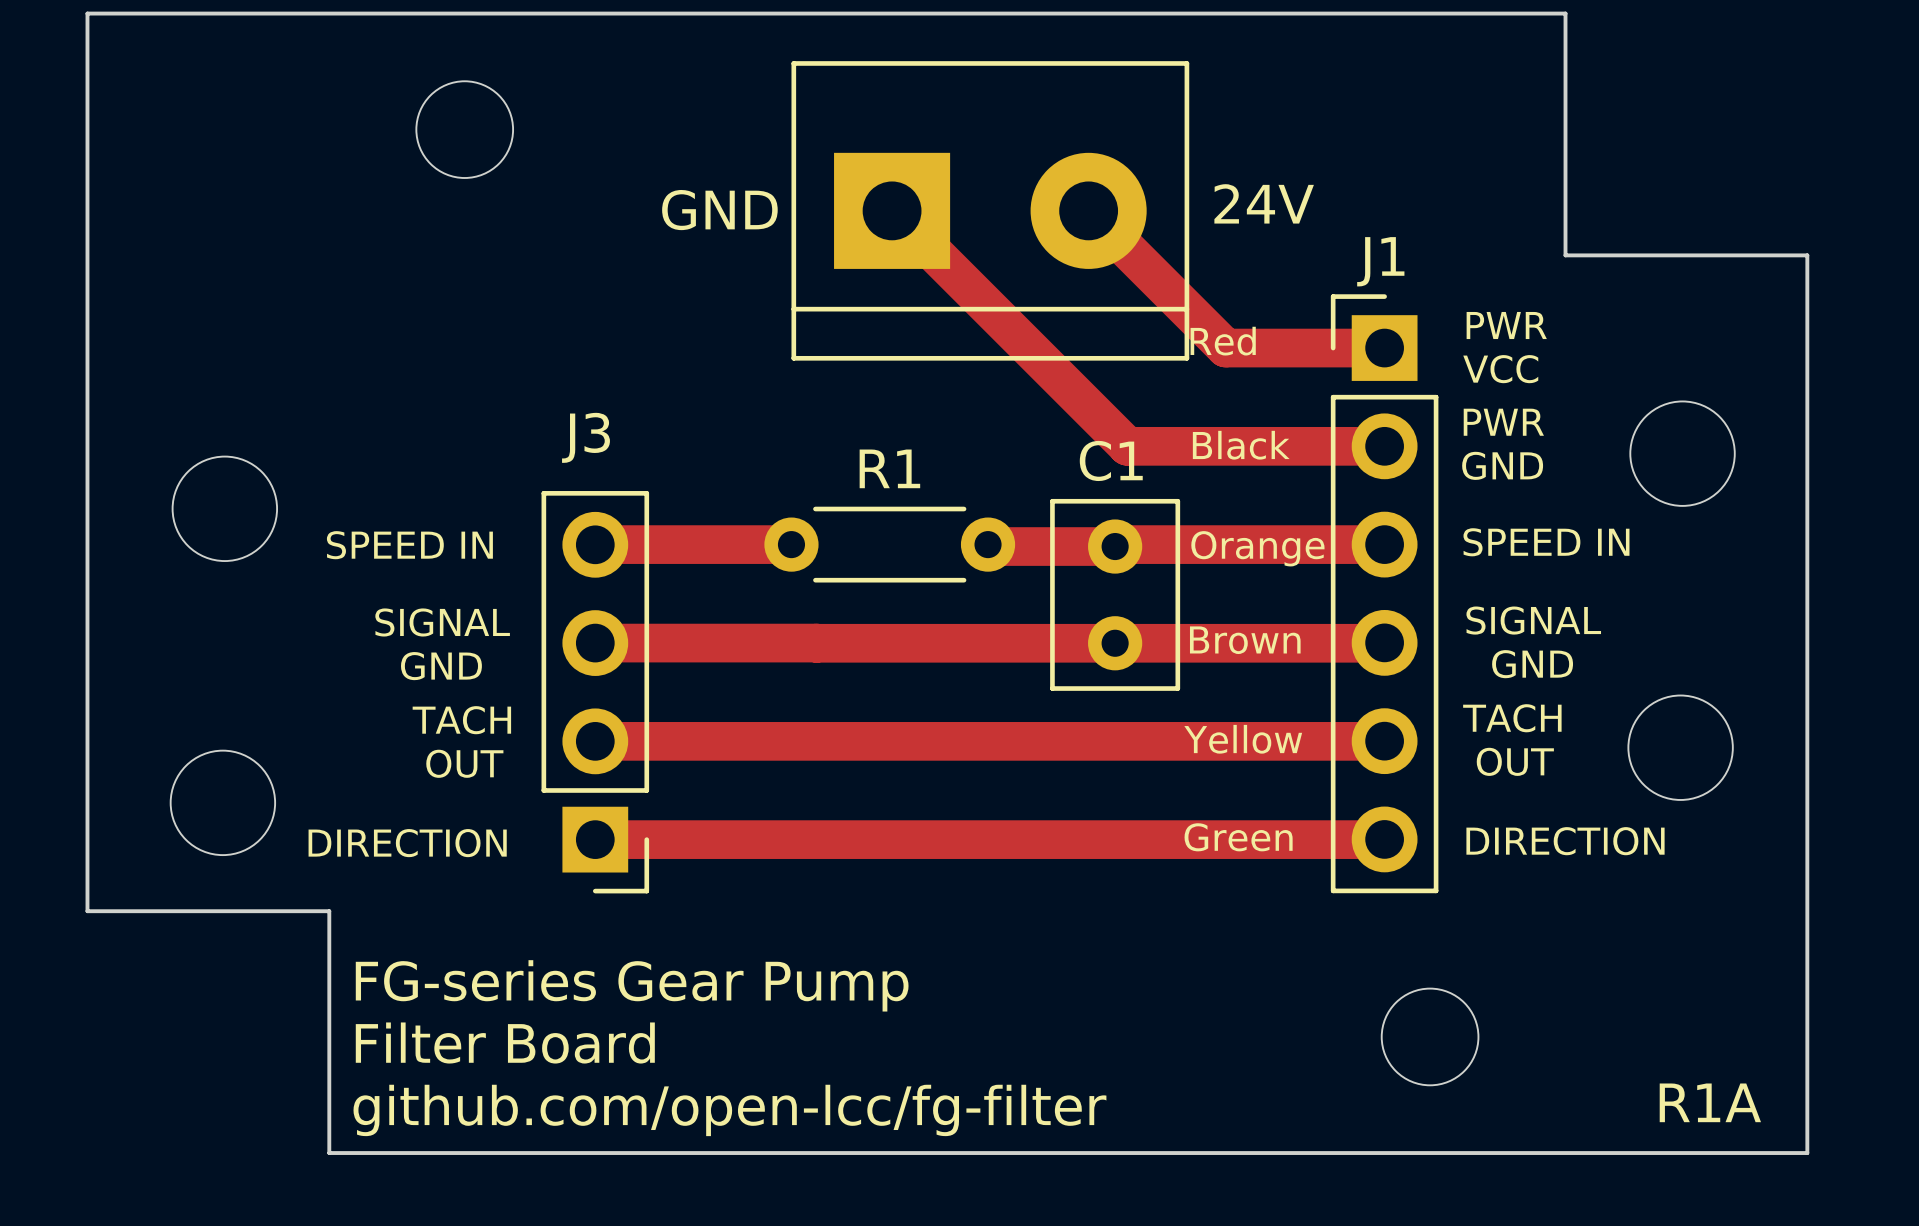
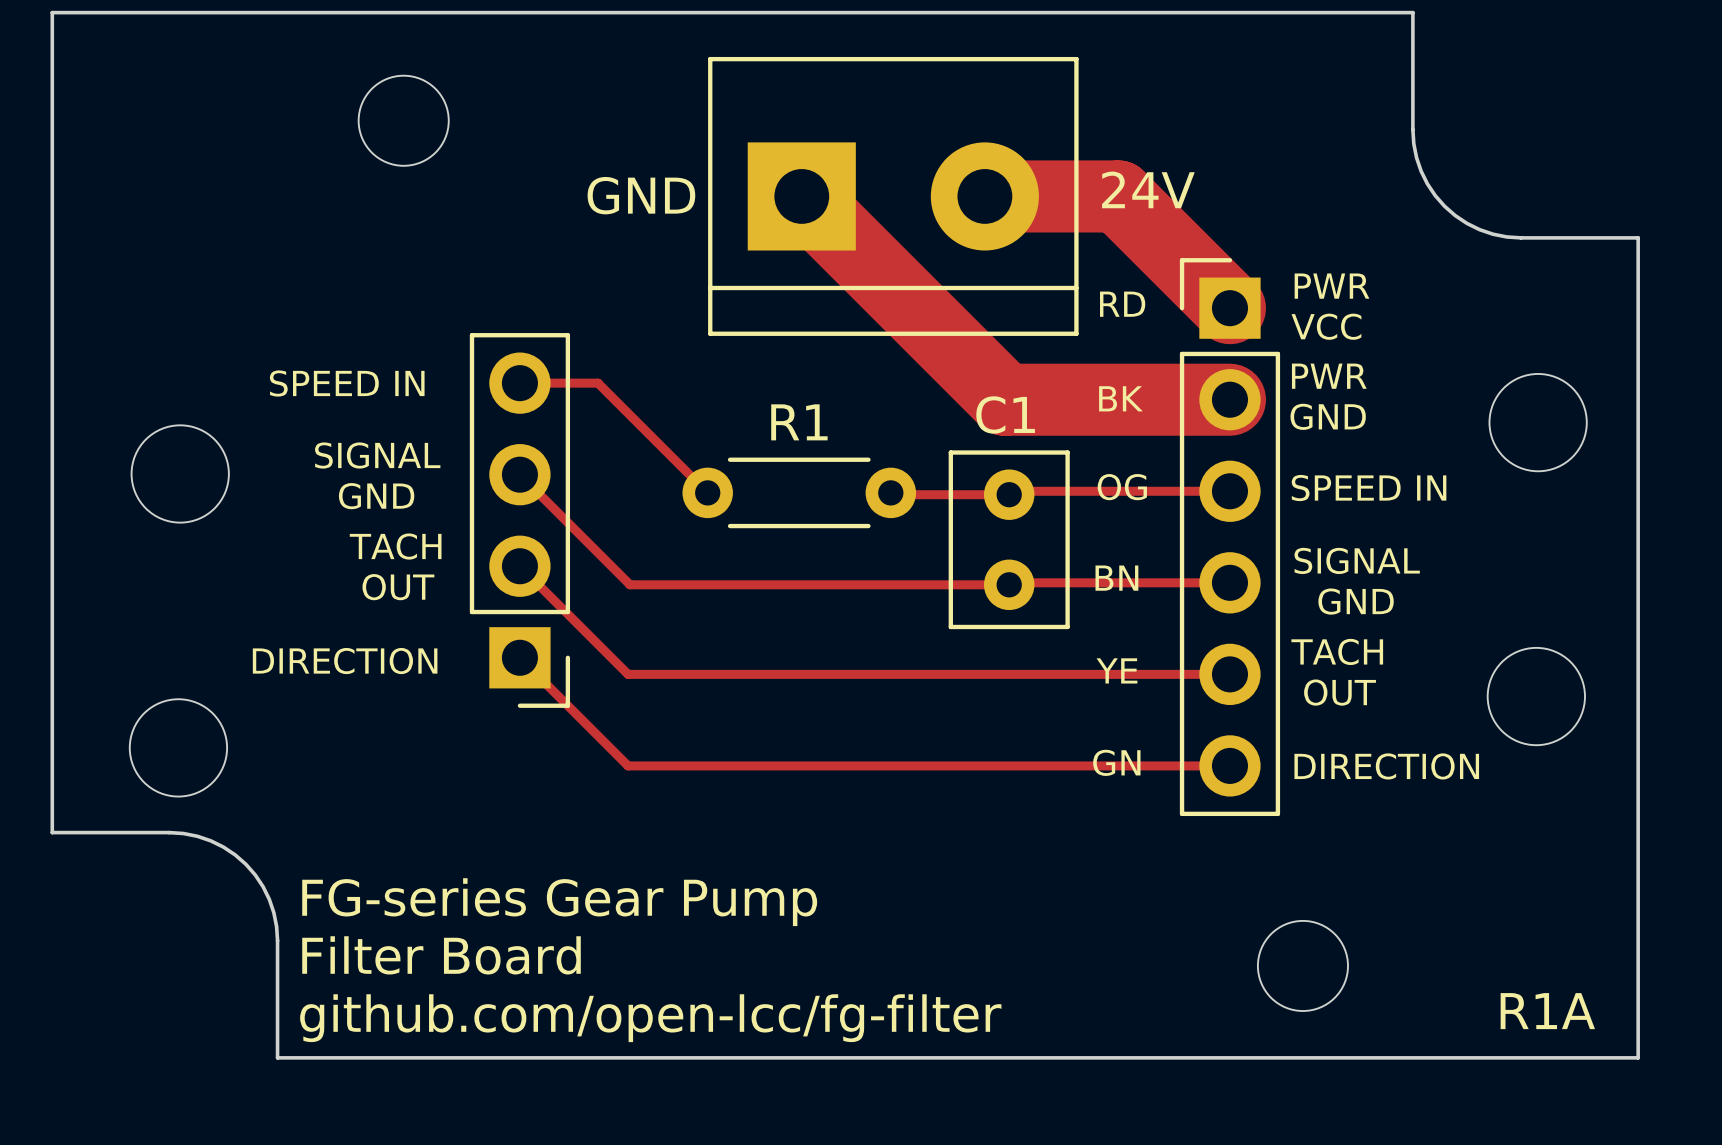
board edge: (1548, 13) (1565, 13) (1565, 255) (1664, 255) -> (1412, 12) (1412, 129) (1416, 157) (1421, 171) (1435, 195) (1455, 215) (1479, 229) (1506, 236) (1521, 237)
top track width: thin (892, 210) (1110, 429) -> thick (801, 196) (1005, 399)
top track: (1088, 210) (1225, 348) (1384, 348) -> (984, 196) (1118, 196) (1229, 308)
board edge: (1789, 255) (1807, 255) (1807, 1153) (329, 1153) (329, 1135) -> (1638, 237) (1638, 1057) (277, 1057)
J1 name: J1 (1380, 261) -> none
text position: PWR (1506, 325) -> PWR (1332, 286)
text: Red (1223, 341) -> RD (1122, 304)
text position: VCC (1500, 369) -> VCC (1326, 326)
top track: none -> (519, 383) (597, 383) (707, 492)
text position: PWR (1503, 422) -> PWR (1329, 376)
top track: (1110, 429) (1127, 446) (1384, 446) -> (1005, 399) (1229, 399)
text: Black (1241, 445) -> BK (1120, 398)
text position: GND (1502, 465) -> GND (1328, 416)
top track: none -> (519, 474) (630, 584) (1229, 582)
top track: none -> (1229, 491) (1012, 491) (1009, 494) (892, 494) (890, 492)
text position: SPEED IN (1546, 542) -> SPEED IN (1369, 488)
top track: (595, 544) (791, 544) -> none
R1 position: (889, 544) -> (799, 492)
top track: (988, 544) (989, 546) (1384, 544) (1382, 546) -> none
text position: SPEED IN (409, 545) -> SPEED IN (347, 383)
text: Orange (1257, 548) -> OG (1122, 487)
part: none -> (519, 520)
J1 position: (1384, 593) -> (1229, 537)
C1 position: (1115, 594) -> (1009, 539)
top track: none -> (519, 566) (628, 674) (1229, 674)
text position: SIGNAL (1533, 620) -> SIGNAL (1357, 560)
text position: SIGNAL (442, 622) -> SIGNAL (377, 455)
text: Brown (1245, 640) -> BN (1116, 578)
top track: (595, 643) (816, 643) -> none
top track: (816, 643) (1384, 643) -> none
text position: GND (1532, 664) -> GND (1356, 601)
text position: GND (441, 666) -> GND (376, 496)
J3: (595, 692) -> none
top track: none -> (519, 657) (628, 765) (1229, 765)
text position: TACH (1512, 718) -> TACH (1337, 651)
text position: TACH (461, 720) -> TACH (395, 546)
text: Yellow (1243, 739) -> YE (1116, 670)
top track: (595, 741) (1384, 741) -> none
text position: OUT (1515, 761) -> OUT (1340, 692)
text position: OUT (464, 763) -> OUT (398, 587)
text: Green (1238, 837) -> GN (1116, 762)
top track: (595, 839) (1384, 839) -> none
text position: DIRECTION (1565, 841) -> DIRECTION (1386, 766)
text position: DIRECTION (407, 843) -> DIRECTION (345, 661)
board edge: (87, 893) (87, 911) (329, 911) (329, 1009) -> (52, 832) (169, 832) (197, 836) (210, 840) (235, 854) (245, 864) (263, 886) (273, 912) (277, 940)
text position: FG-series Gear Pump (632, 985) -> FG-series Gear Pump (559, 902)
text position: Filter Board (505, 1043) -> Filter Board (441, 955)
text position: R1A (1710, 1102) -> R1A (1547, 1011)
text position: github.com/open-lcc/fg-filter (729, 1110) -> github.com/open-lcc/fg-filter (650, 1018)

